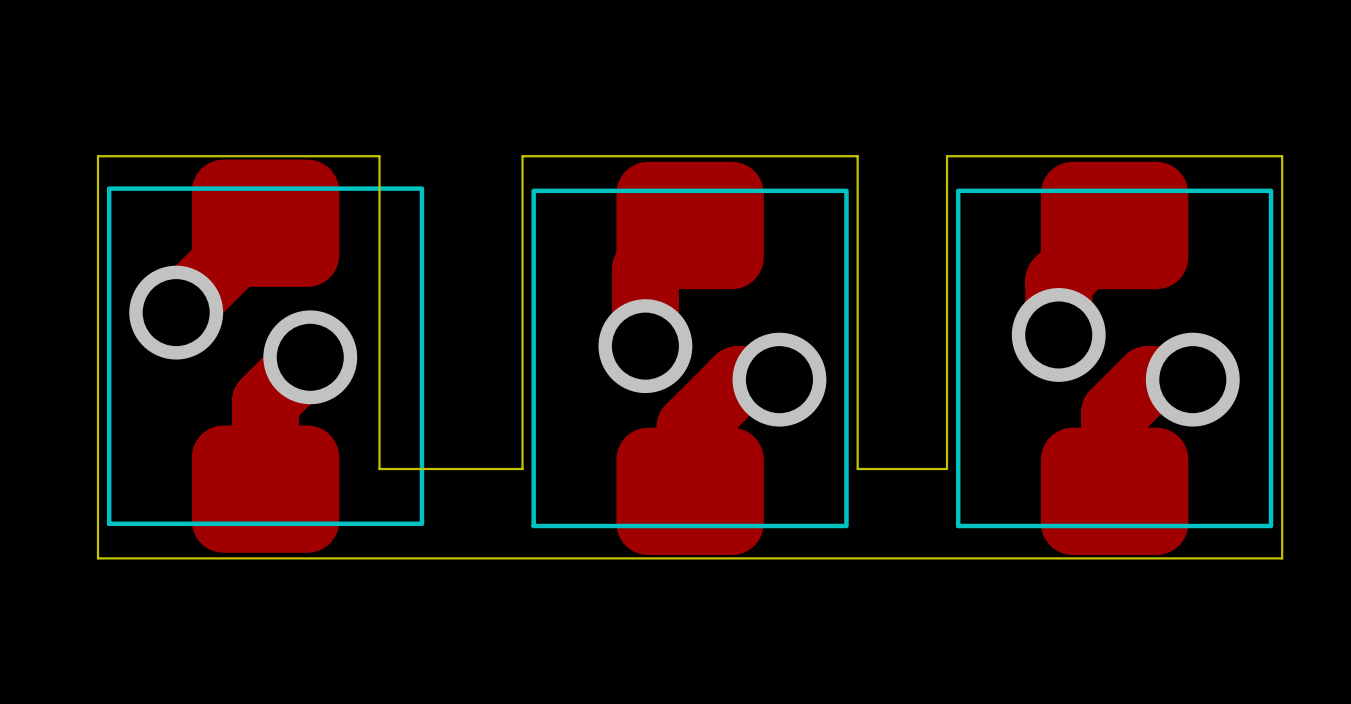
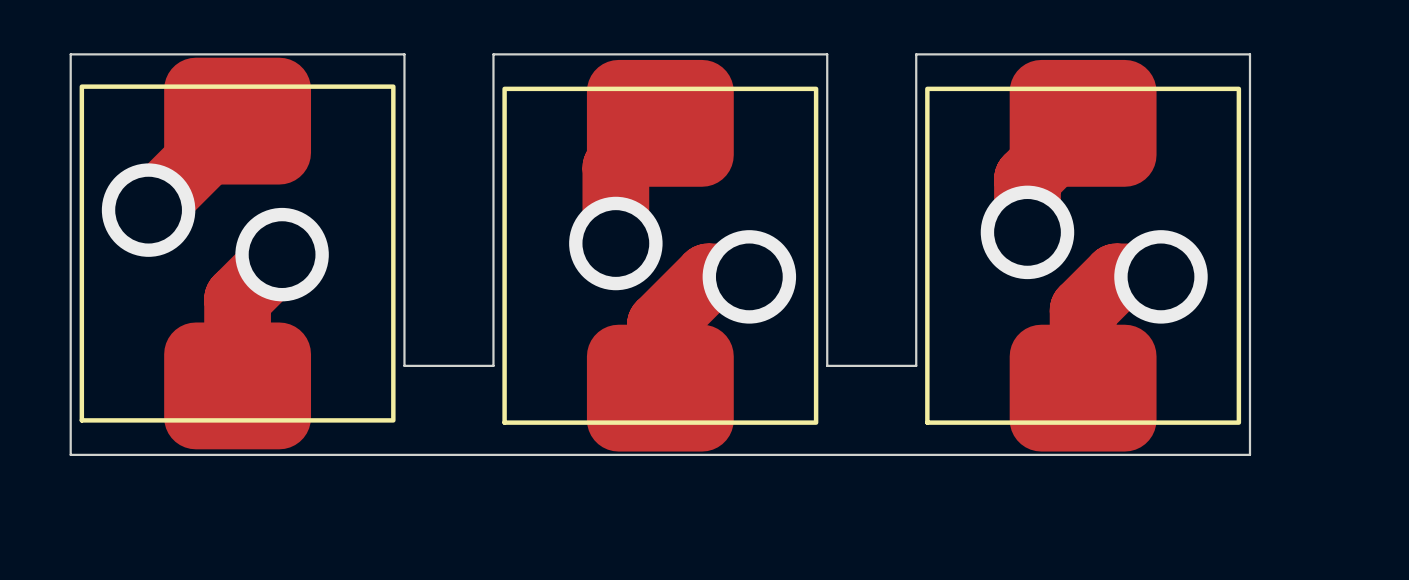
board edge: (379, 156) (379, 469) (433, 469) -> (351, 54) (404, 54) (404, 365)

